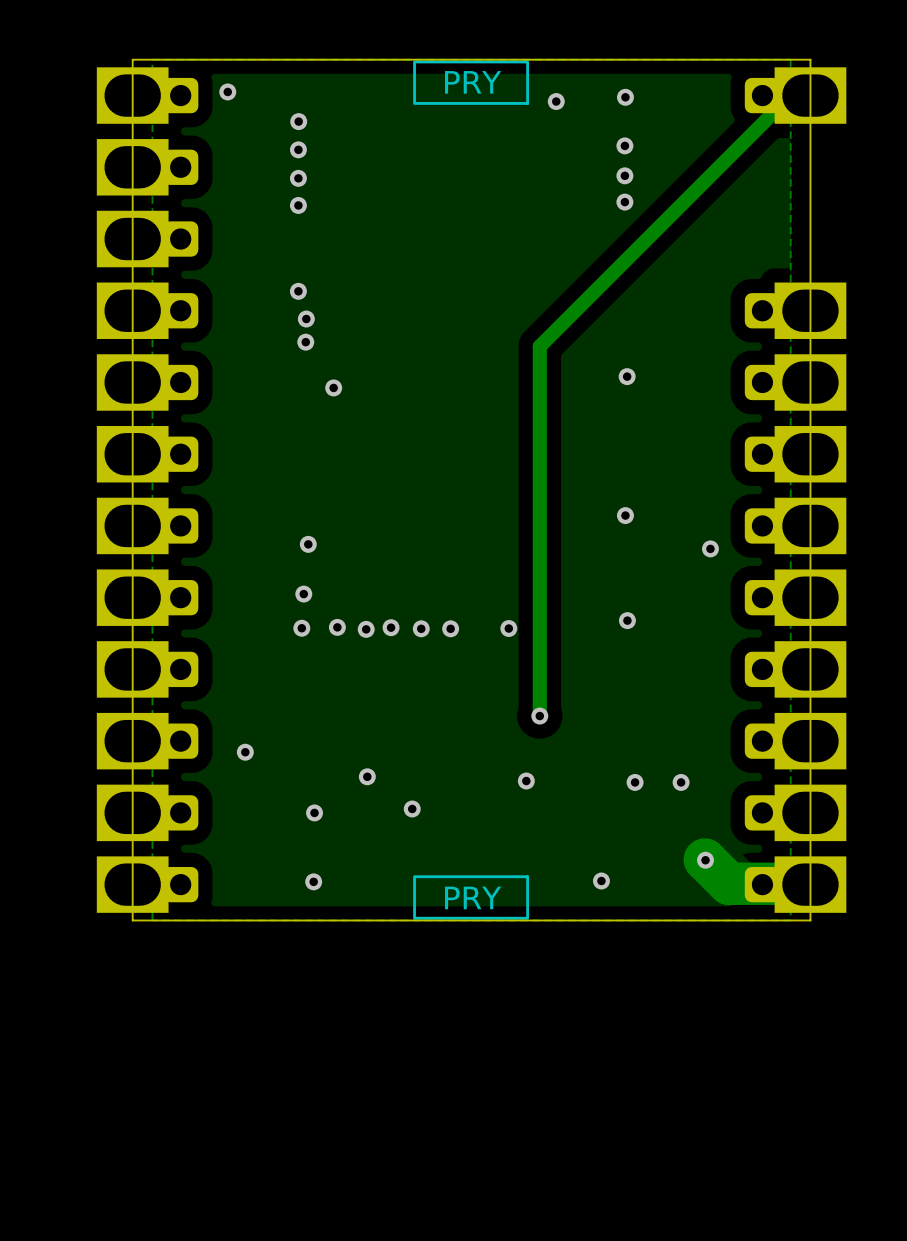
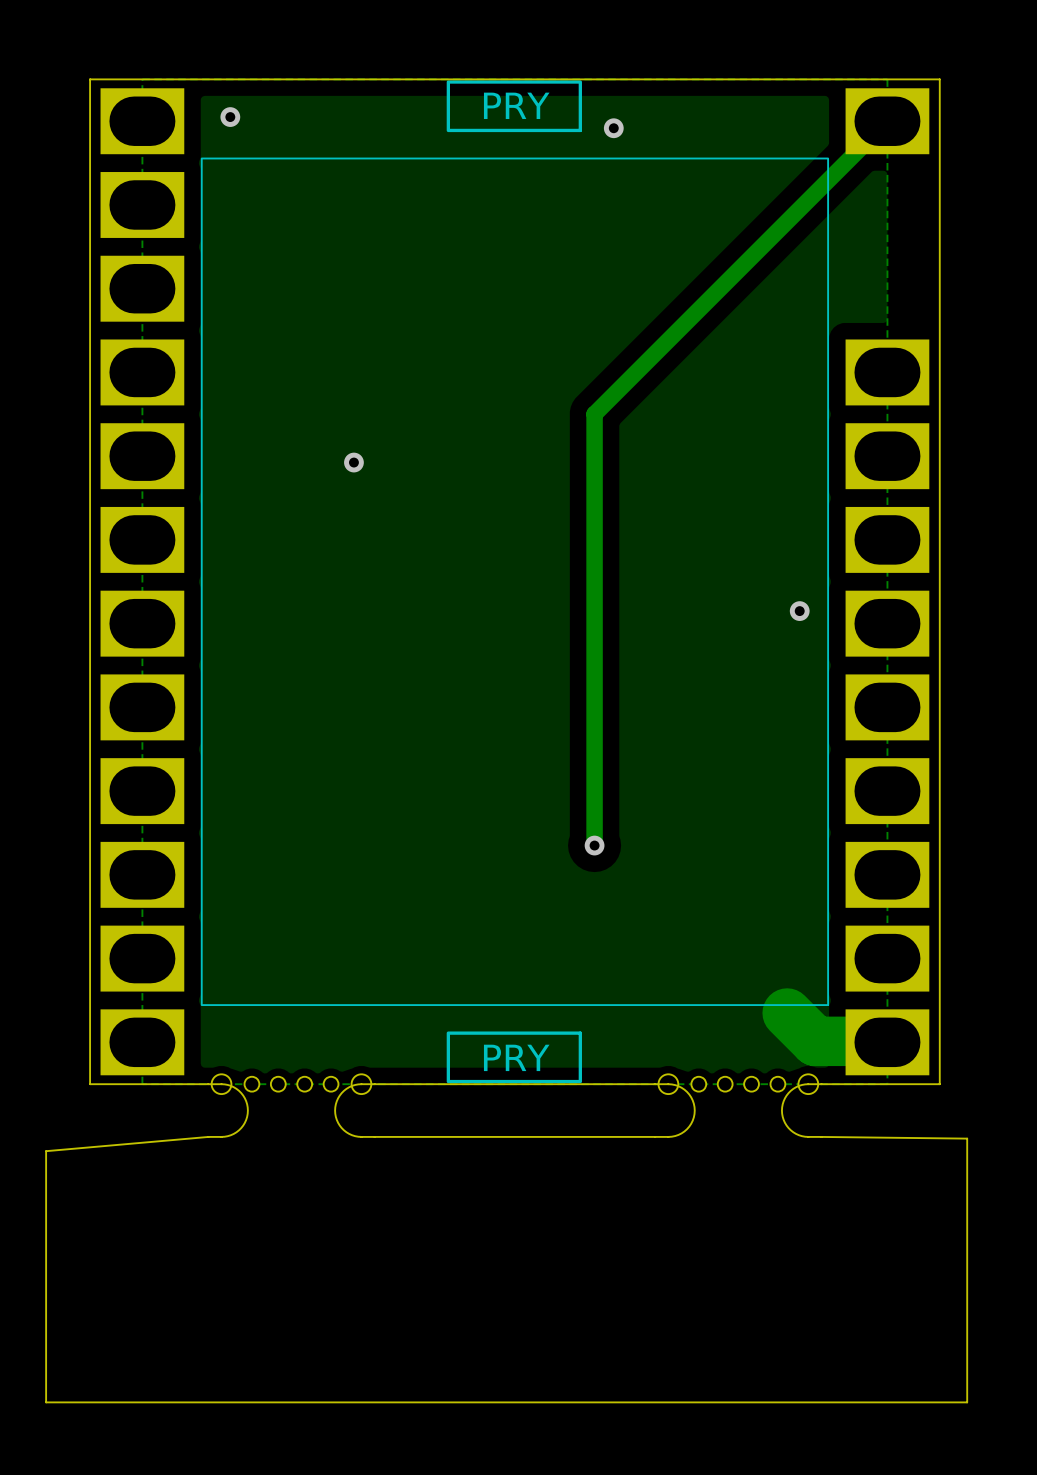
part footprint: [96, 58, 847, 922] -> [89, 78, 941, 1138]
via: (625, 97) -> none
via: (298, 121) -> none
via: (624, 145) -> none
via: (298, 149) -> none
via: (624, 175) -> none
via: (298, 178) -> none
via: (624, 202) -> none
via: (298, 205) -> none
via: (298, 291) -> none
via: (306, 319) -> none
via: (305, 342) -> none
via: (627, 376) -> none
via: (625, 515) -> none
via: (308, 544) -> none
via position: (710, 548) -> (799, 611)
via: (303, 594) -> none
via: (627, 620) -> none
via: (337, 627) -> none
via: (391, 627) -> none
via: (301, 628) -> none
via: (421, 628) -> none
via: (450, 628) -> none
via: (508, 628) -> none
via: (366, 629) -> none
via: (245, 752) -> none
via: (367, 776) -> none
via: (526, 781) -> none
via: (635, 782) -> none
via: (681, 782) -> none
via: (412, 808) -> none
via: (314, 812) -> none
via: (705, 860) -> none
via: (313, 881) -> none
via: (601, 881) -> none
board edge: none -> (655, 1136) (374, 1136)
board edge: none -> (821, 1136) (967, 1138) (967, 1402) (46, 1402) (46, 1151) (208, 1136)

